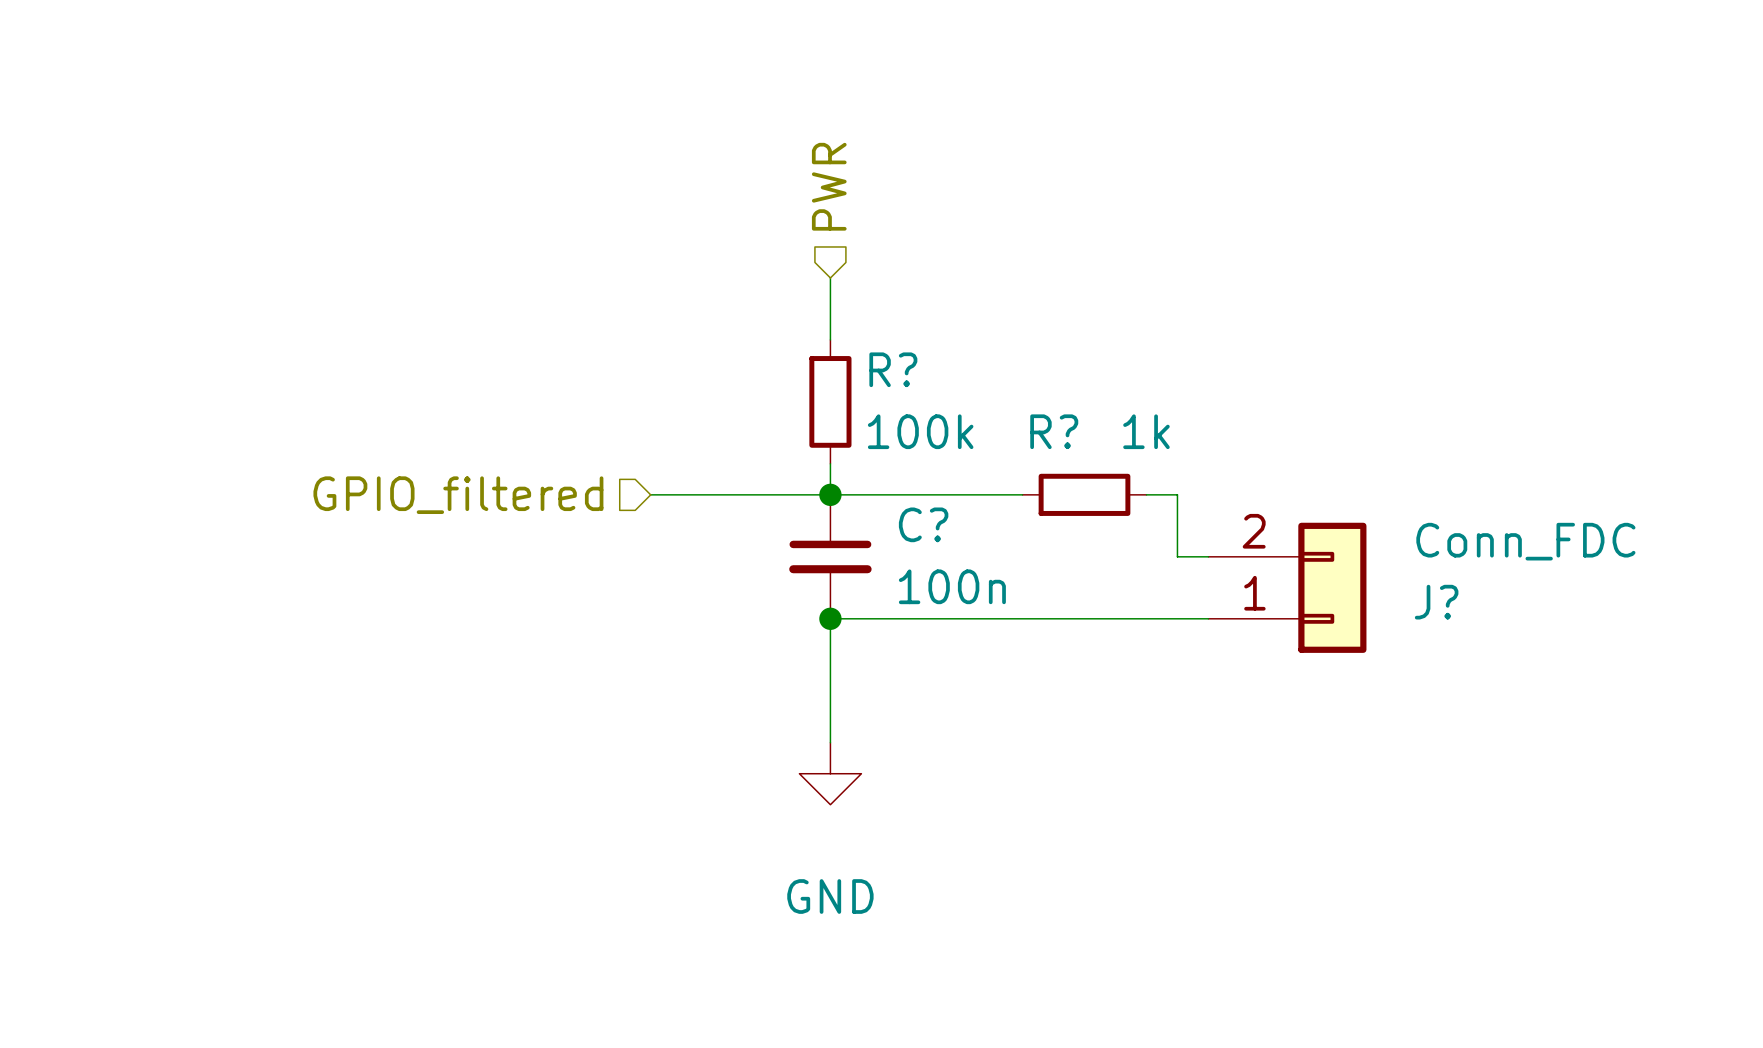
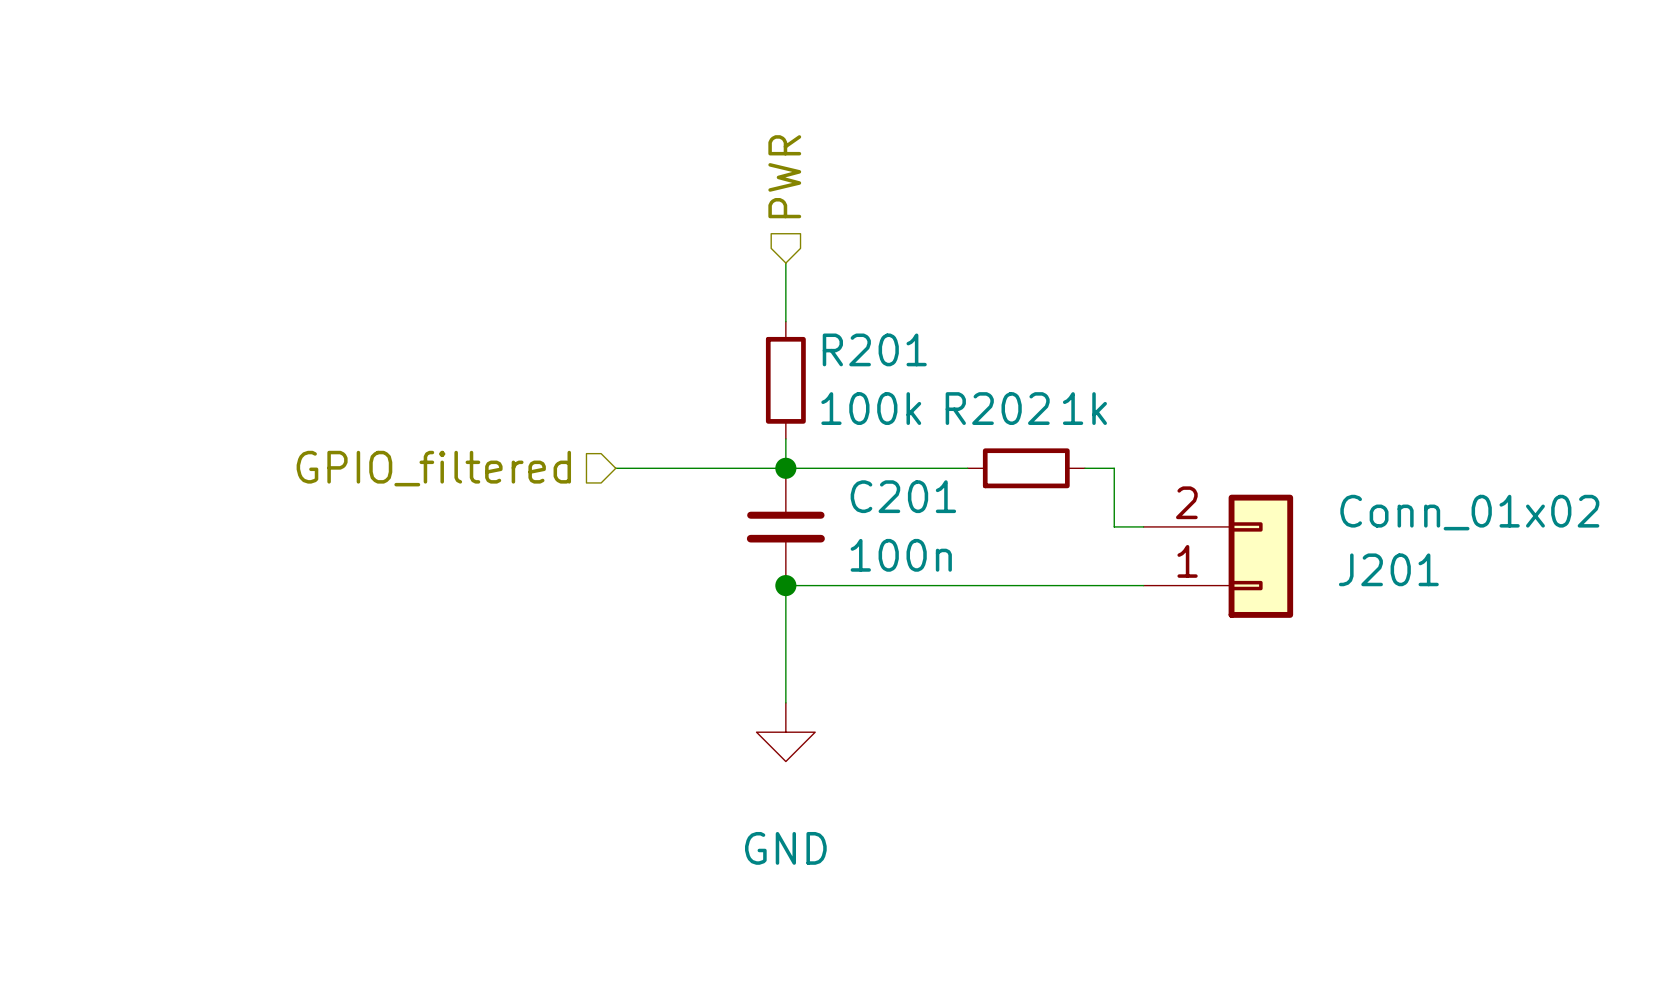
R? name: R? (893, 369) -> R201 (874, 349)
R? name: R? (1054, 431) -> R202 (997, 408)
C? name: C? (923, 524) -> C201 (903, 496)
J? value: Conn_FDC (1525, 541) -> Conn_01x02 (1469, 512)
J? name: J? (1436, 602) -> J201 (1388, 569)

